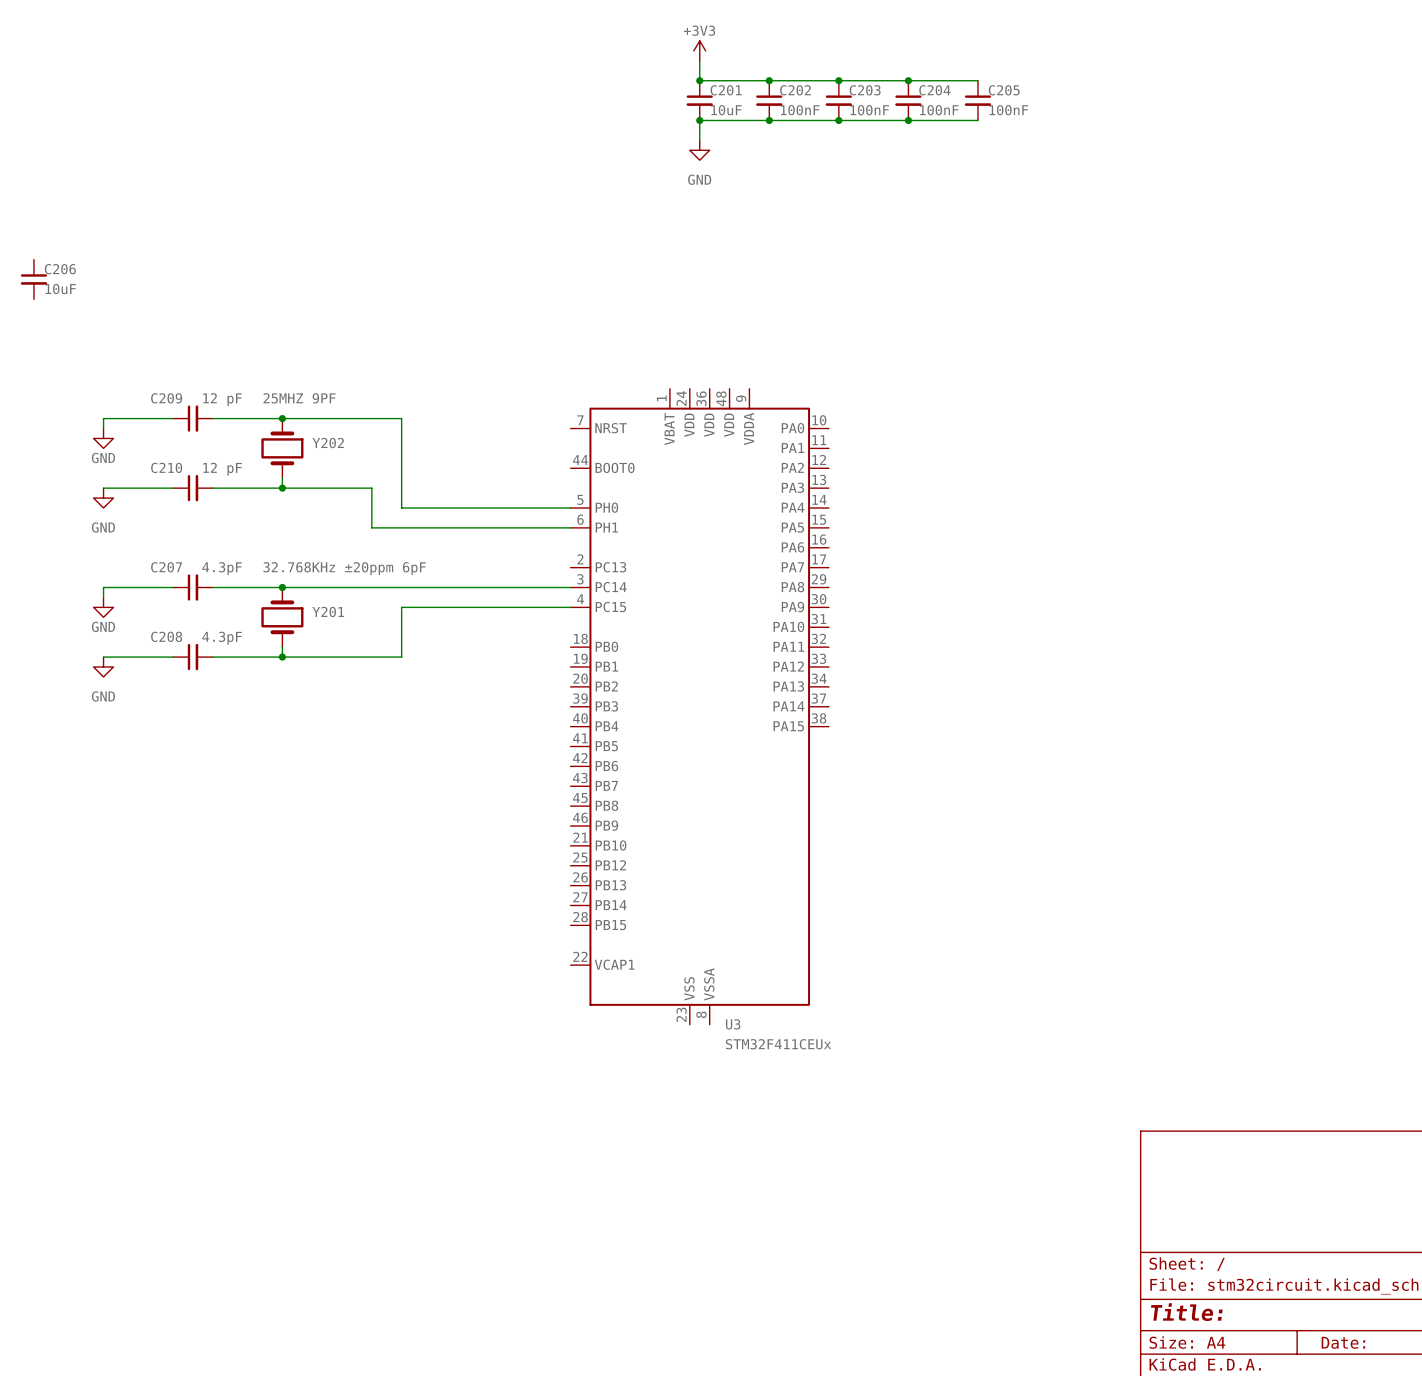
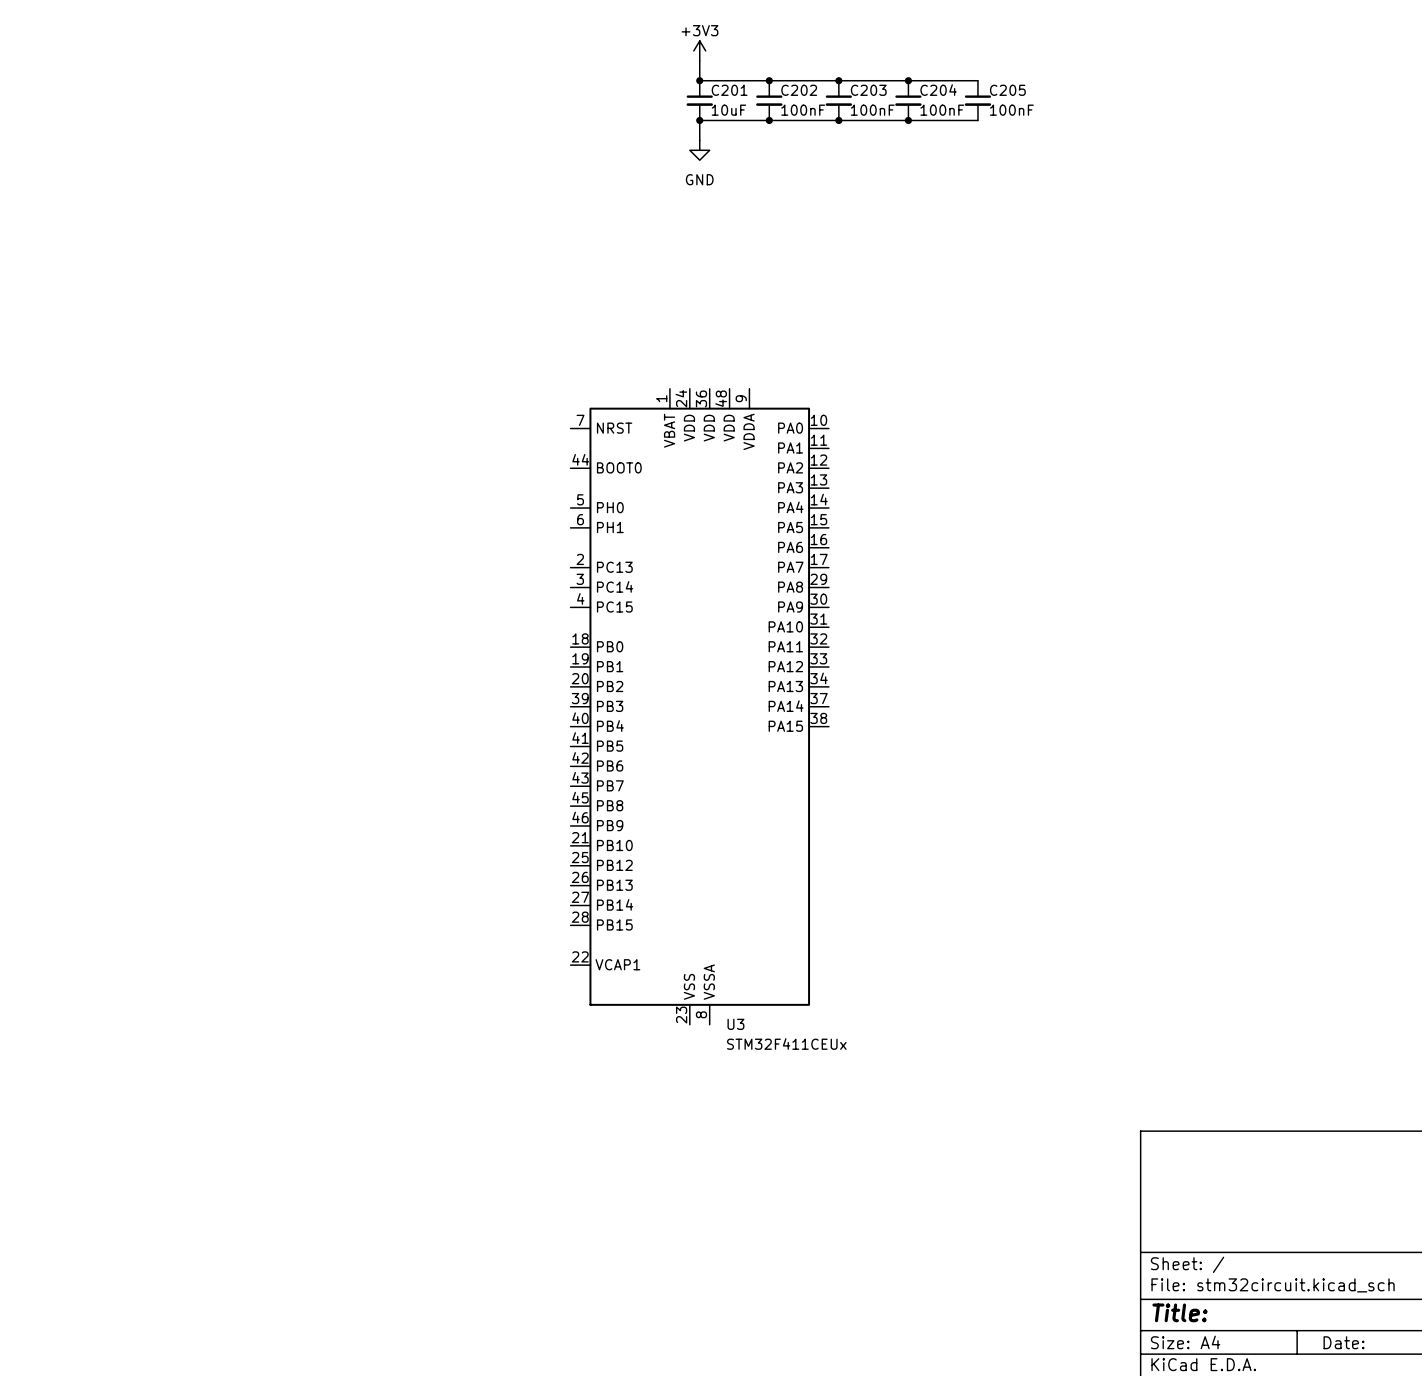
C206: 10uF (33, 279) -> none
wire: (173, 418) (103, 418) (103, 428) -> none
C209: 12 pF (192, 418) -> none
wire: (212, 418) (401, 418) (401, 508) (570, 508) -> none
junction: (282, 418) -> none
power symbol: GND (103, 438) -> none
Y202: 25MHZ 9PF (282, 448) -> none
wire: (282, 478) (282, 488) -> none
wire: (103, 488) (173, 488) -> none
C210: 12 pF (192, 488) -> none
wire: (212, 488) (371, 488) (371, 527) (570, 527) -> none
junction: (282, 488) -> none
power symbol: GND (103, 498) -> none
wire: (173, 587) (103, 587) (103, 597) -> none
C207: 4.3pF (192, 587) -> none
wire: (212, 587) (570, 587) -> none
junction: (282, 587) -> none
power symbol: GND (103, 607) -> none
wire: (570, 607) (401, 607) (401, 657) (212, 657) -> none
Y201: 32.768KHz ±20ppm 6pF (282, 617) -> none
wire: (282, 647) (282, 657) -> none
wire: (103, 657) (173, 657) -> none
C208: 4.3pF (192, 657) -> none
junction: (282, 657) -> none
power symbol: GND (103, 667) -> none

